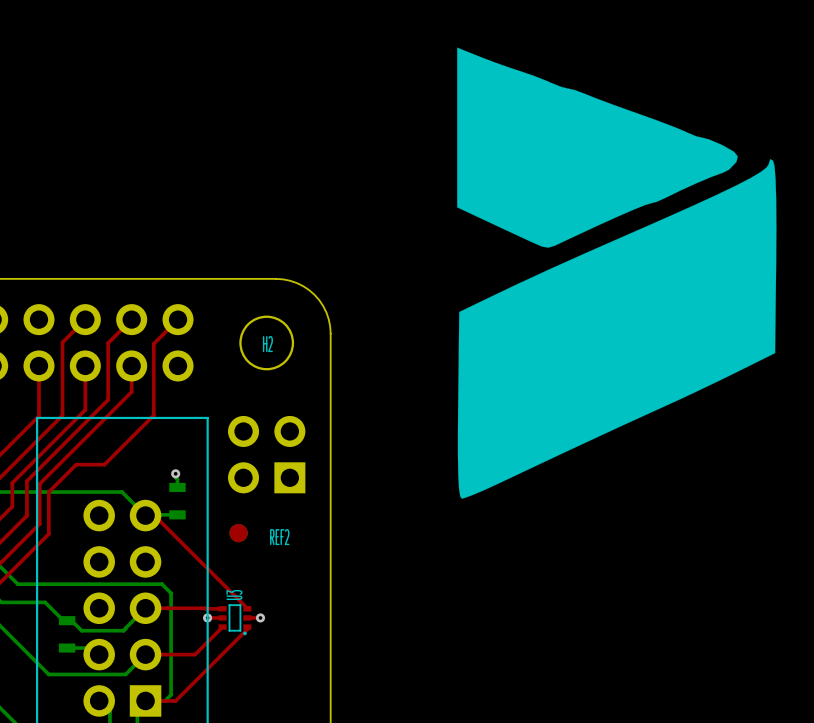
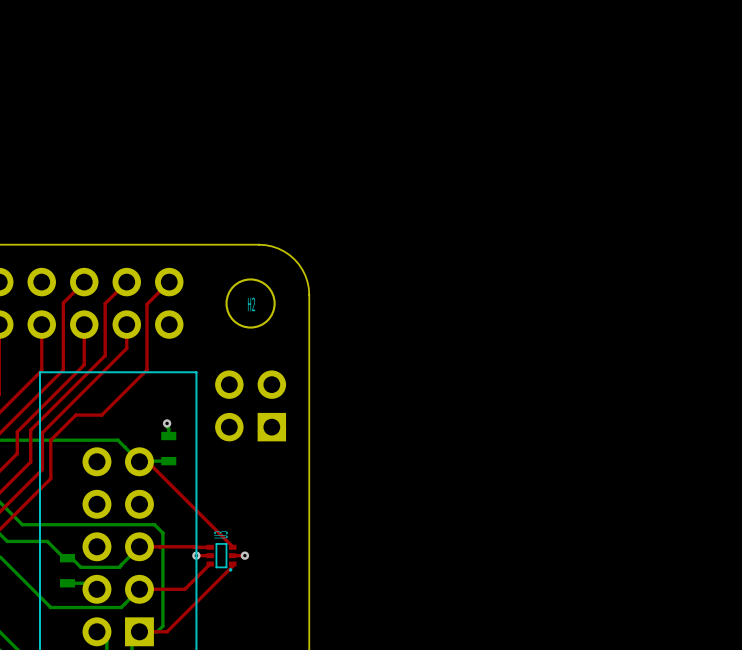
drawing: [457, 47, 777, 499] -> none
REF2: (238, 533) -> none

